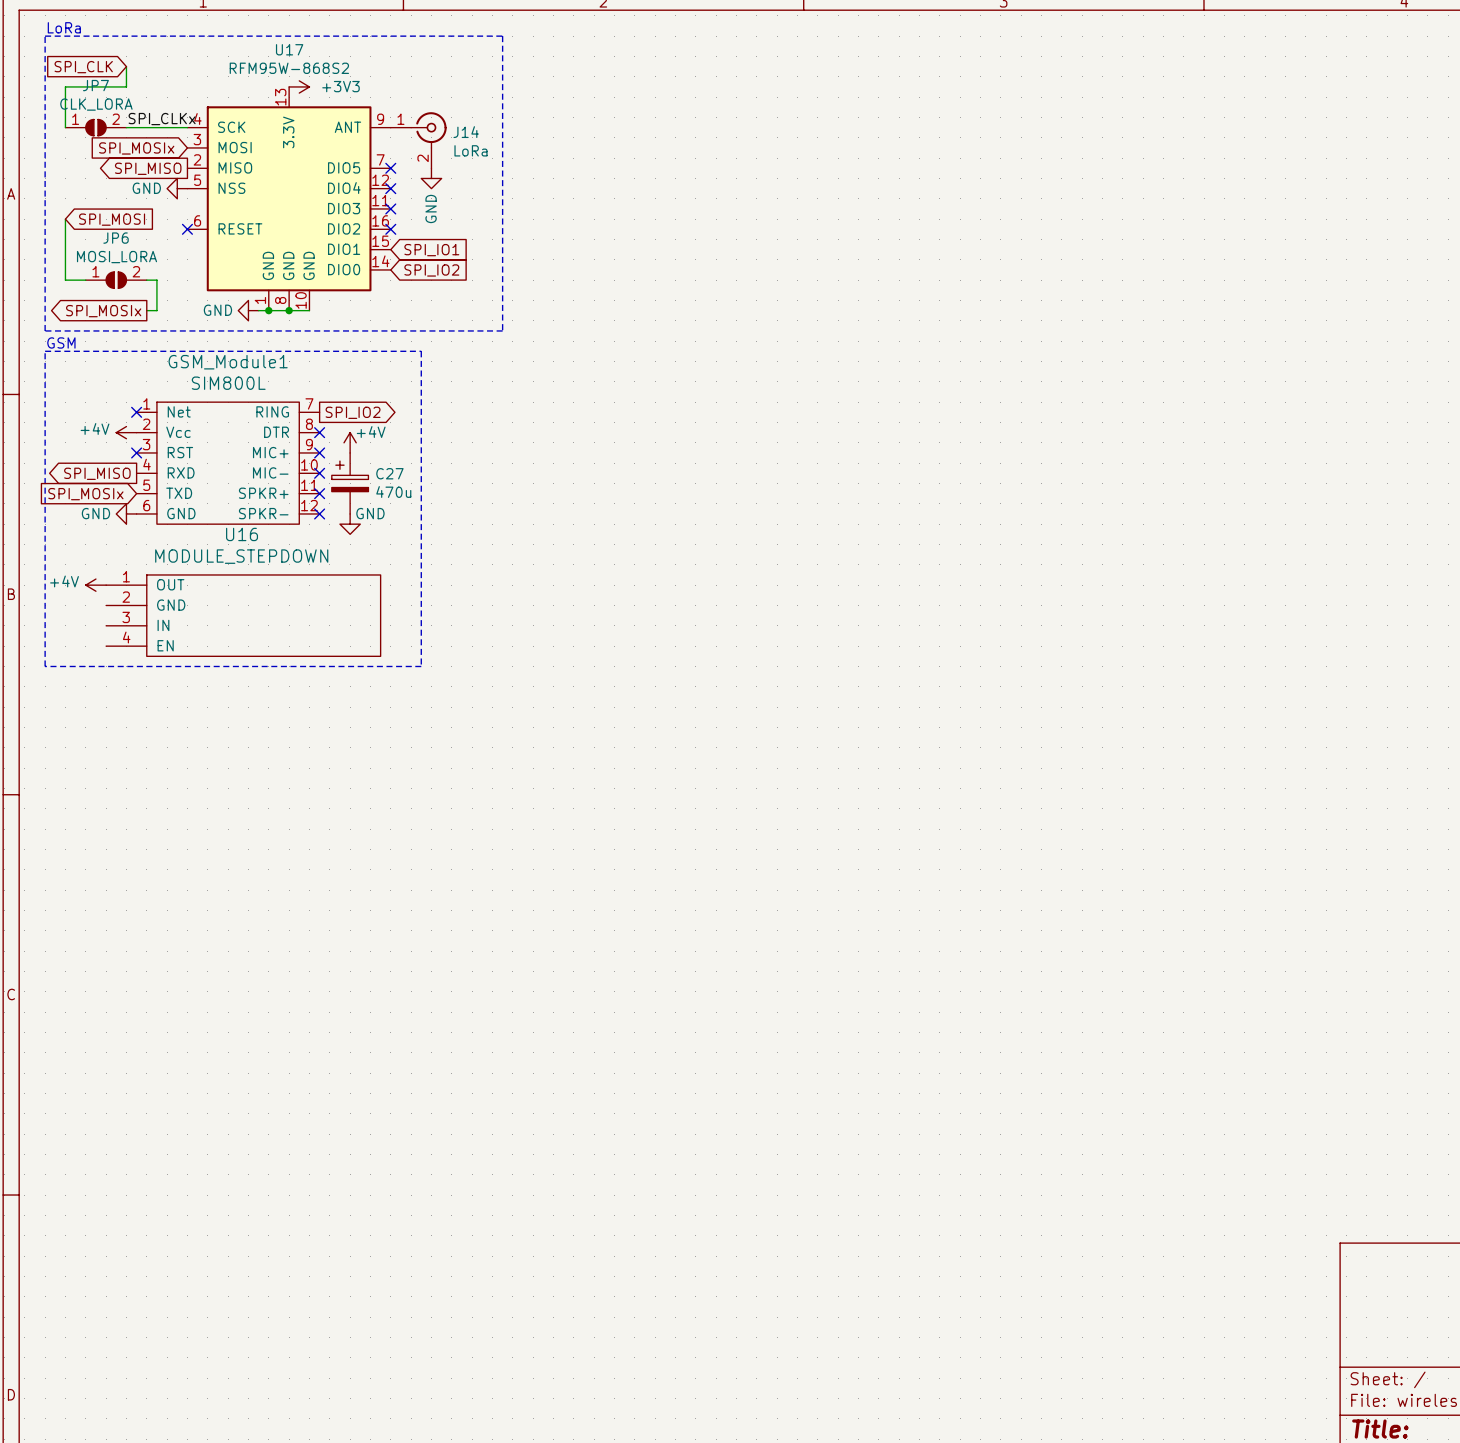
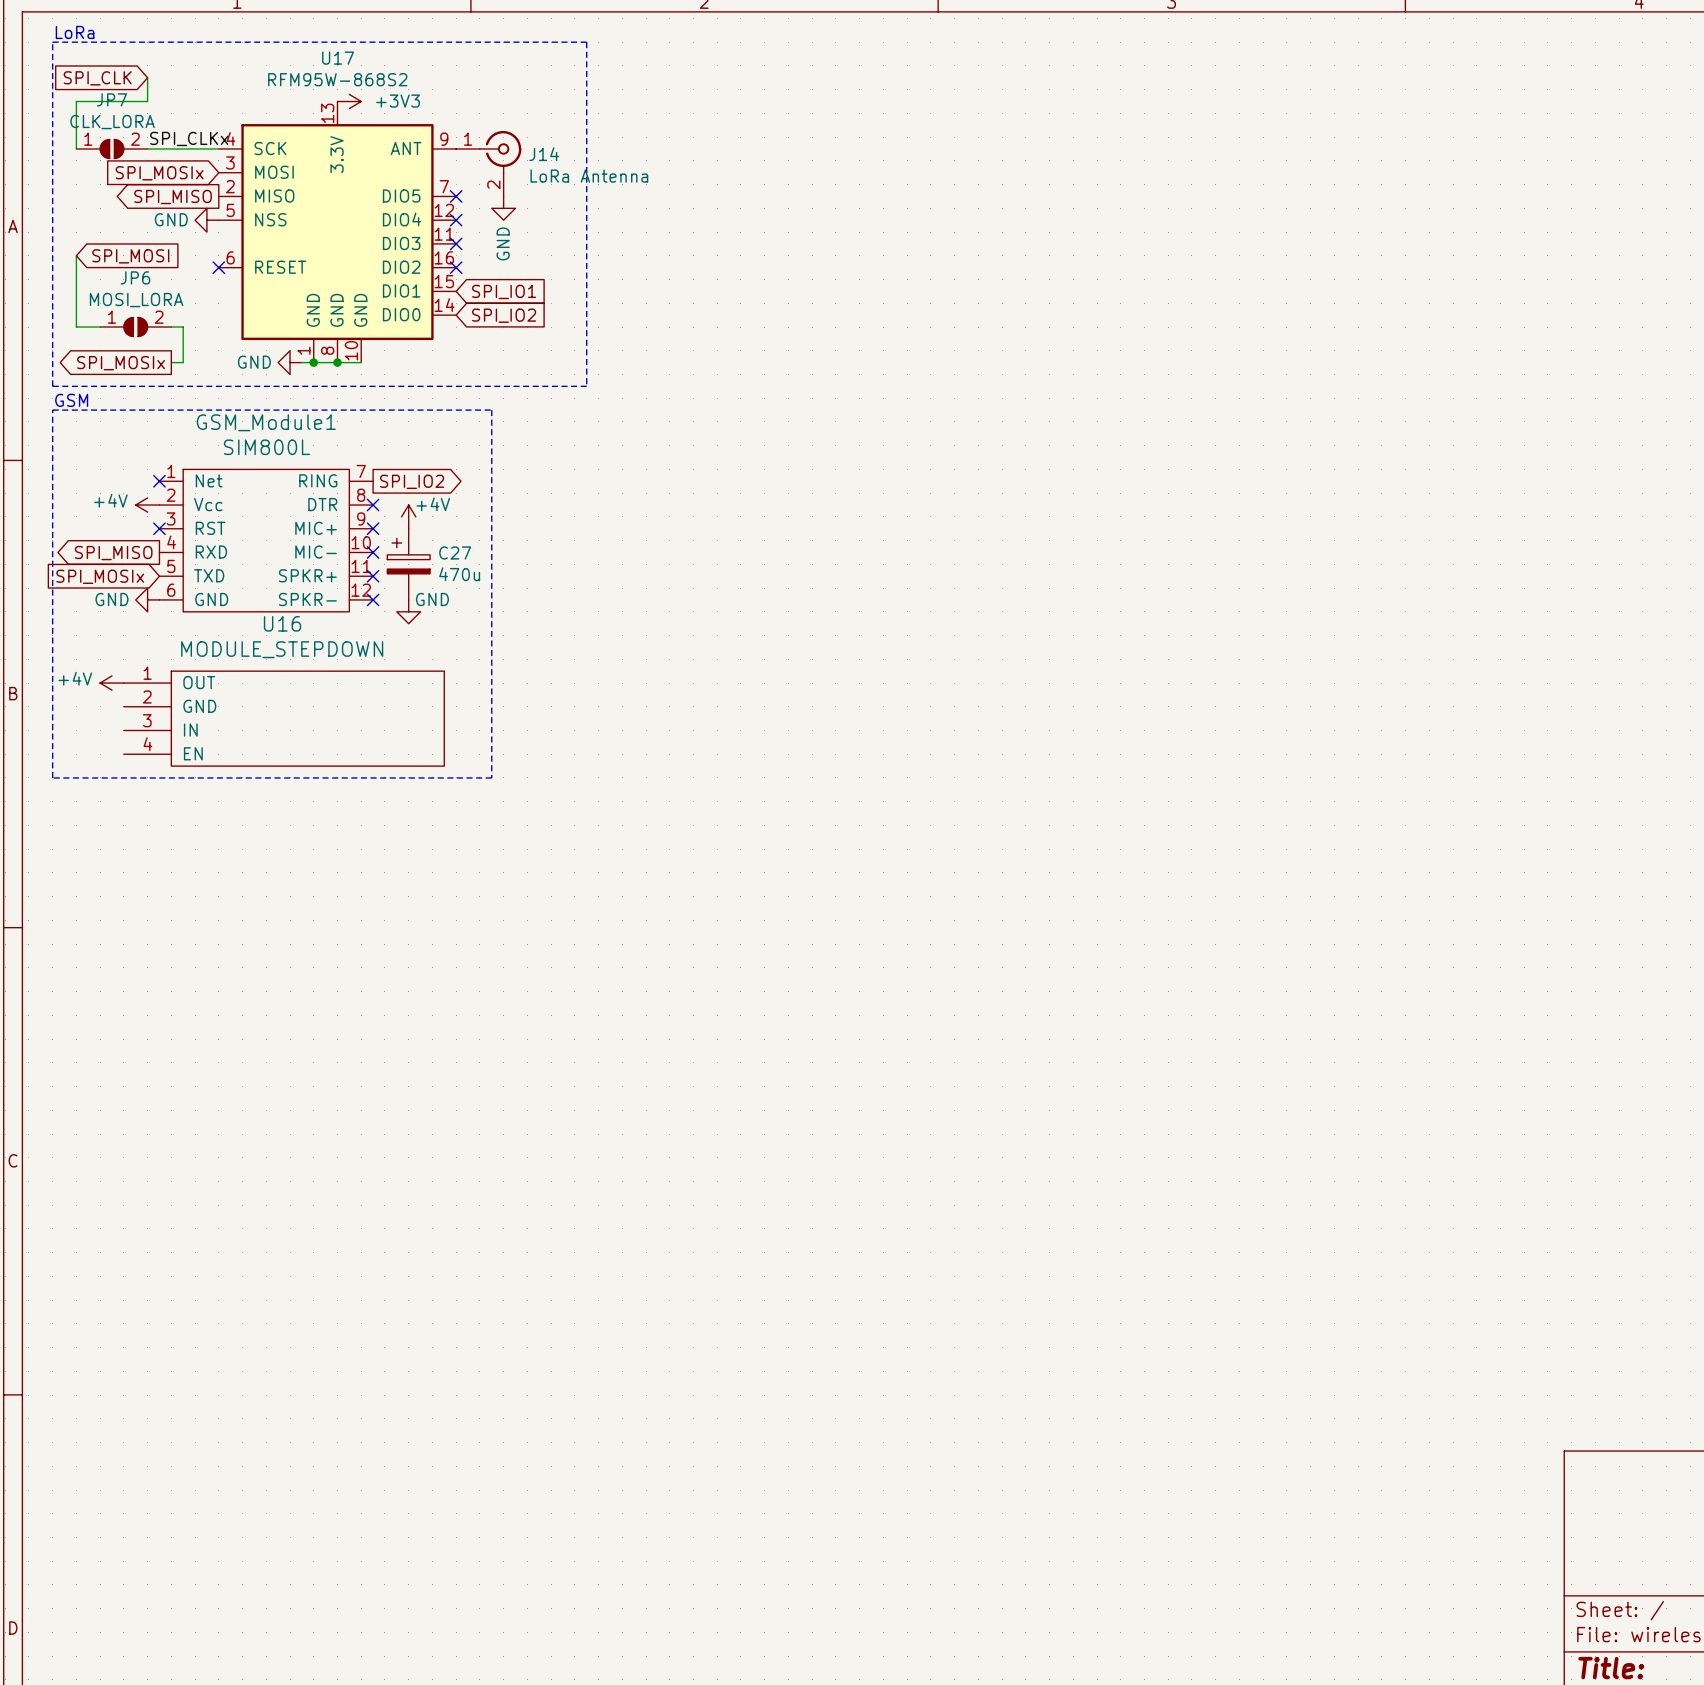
J14 value: LoRa (470, 150) -> LoRa Antenna (589, 176)

